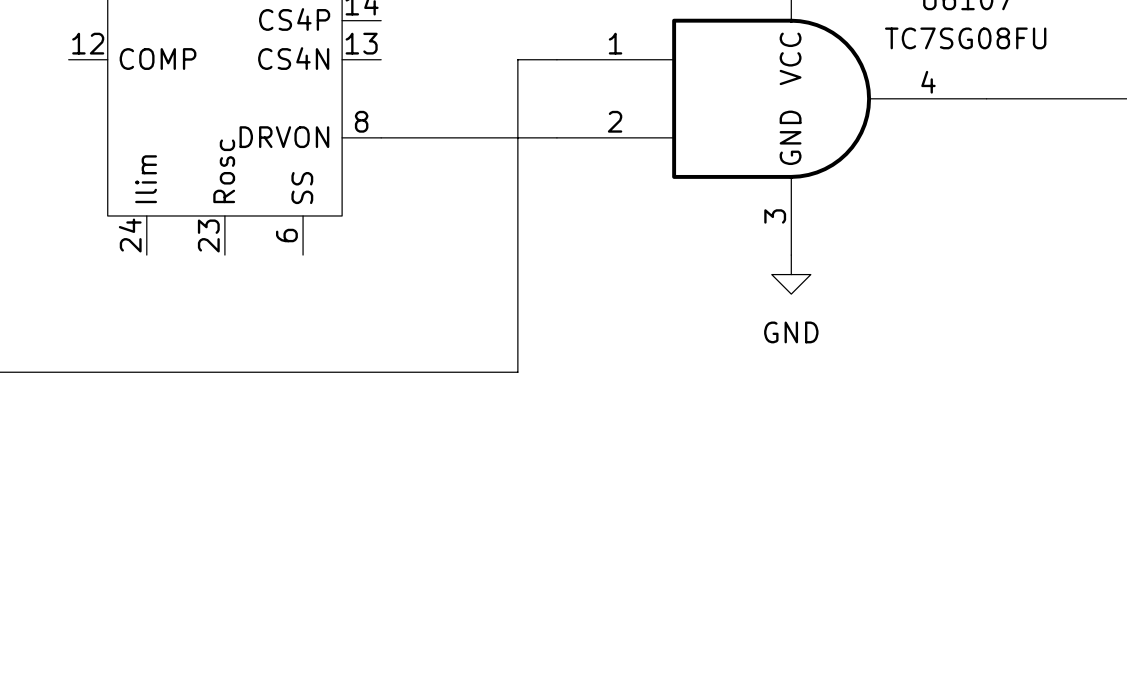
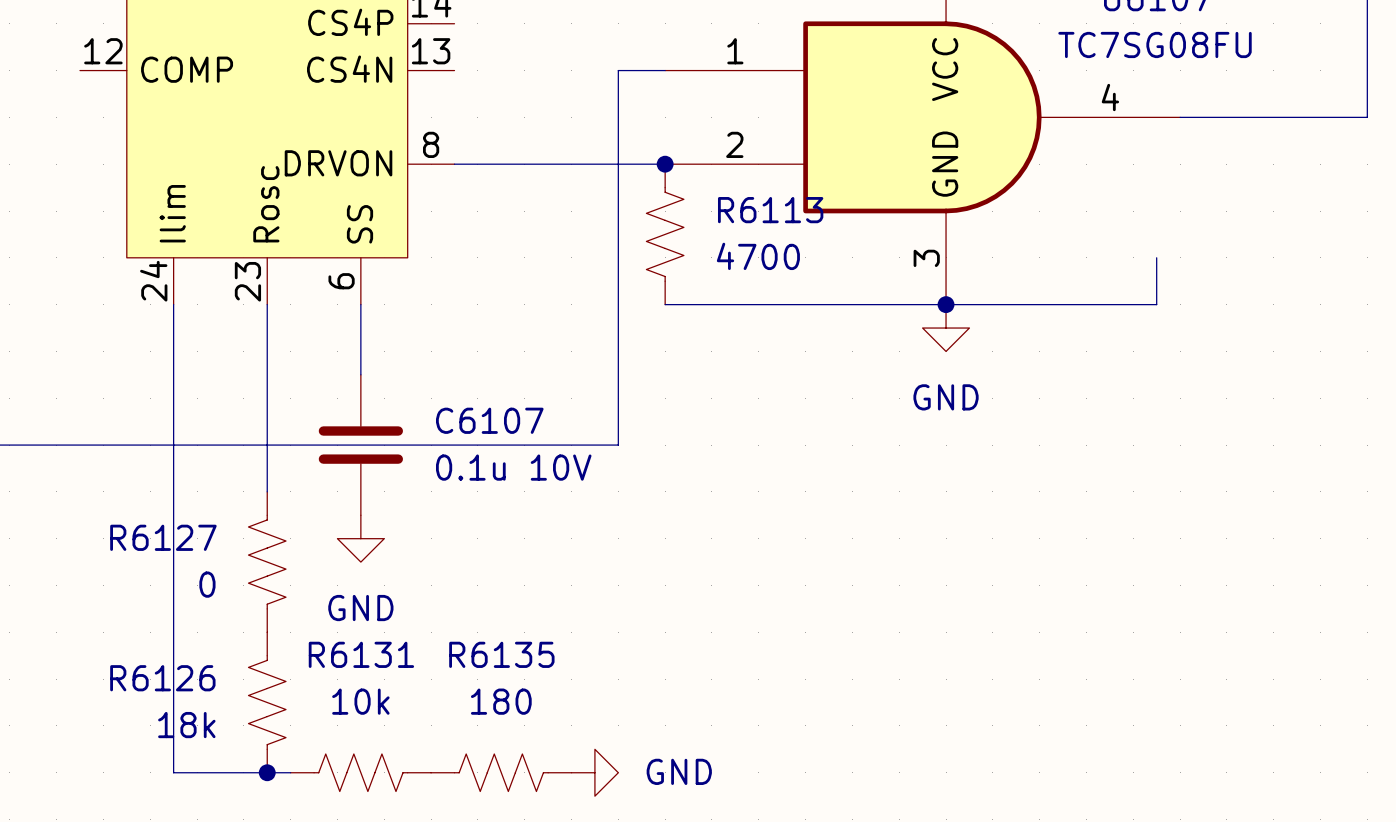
junction: none -> (665, 164)
R6113: none -> 4700 (665, 234)
wire: none -> (1156, 257) (1156, 304) (665, 304)
wire: none -> (173, 304) (173, 772) (290, 772)
wire: none -> (267, 304) (267, 491)
wire: none -> (360, 304) (360, 374)
junction: none -> (946, 304)
C6107: none -> 0.1u 10V (360, 445)
power symbol: none -> GND (360, 538)
R6127: none -> 0 (267, 562)
R6126: none -> 18k (267, 702)
junction: none -> (267, 772)
R6131: none -> 10k (360, 772)
R6135: none -> 180 (501, 772)
power symbol: none -> GND (594, 772)

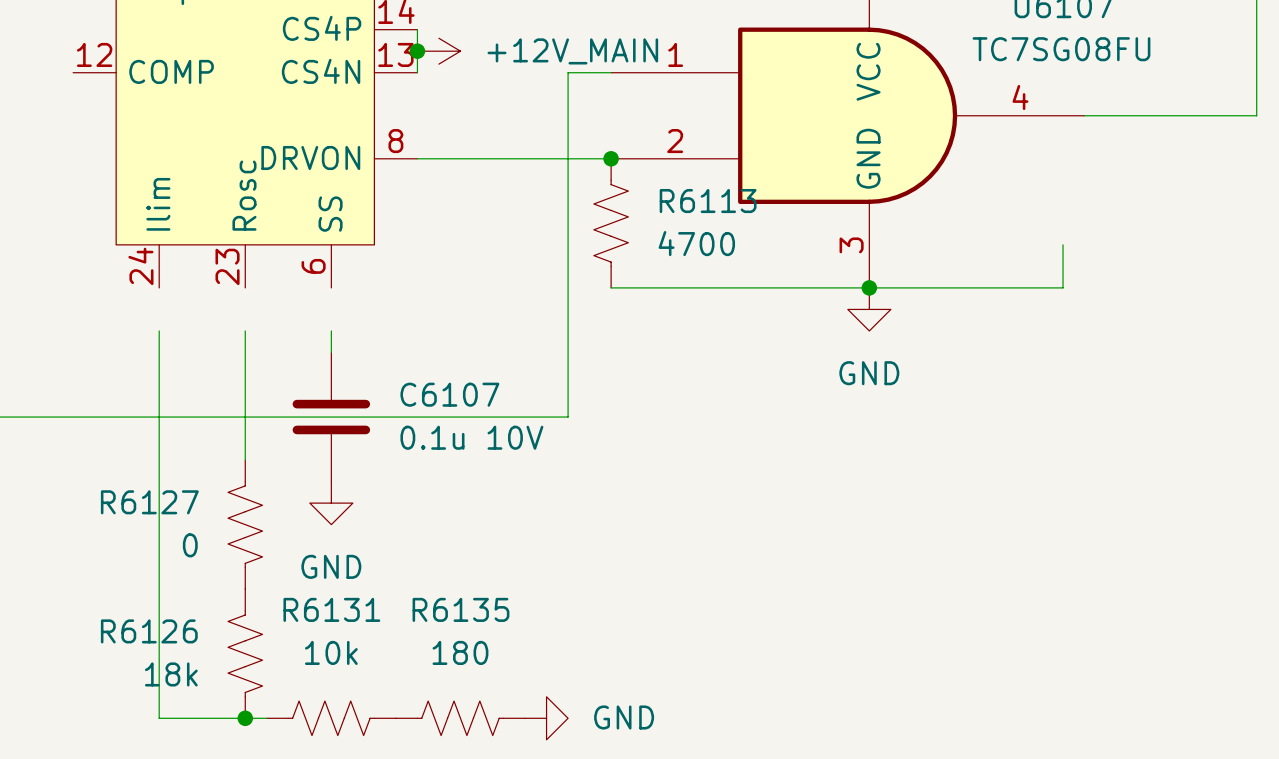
junction: none -> (417, 51)
power symbol: none -> +12V_MAIN (438, 51)
wire: (173, 304) (173, 351) -> none
wire: (267, 304) (267, 351) -> none
wire: (360, 304) (360, 351) -> (417, 29) (417, 72)

